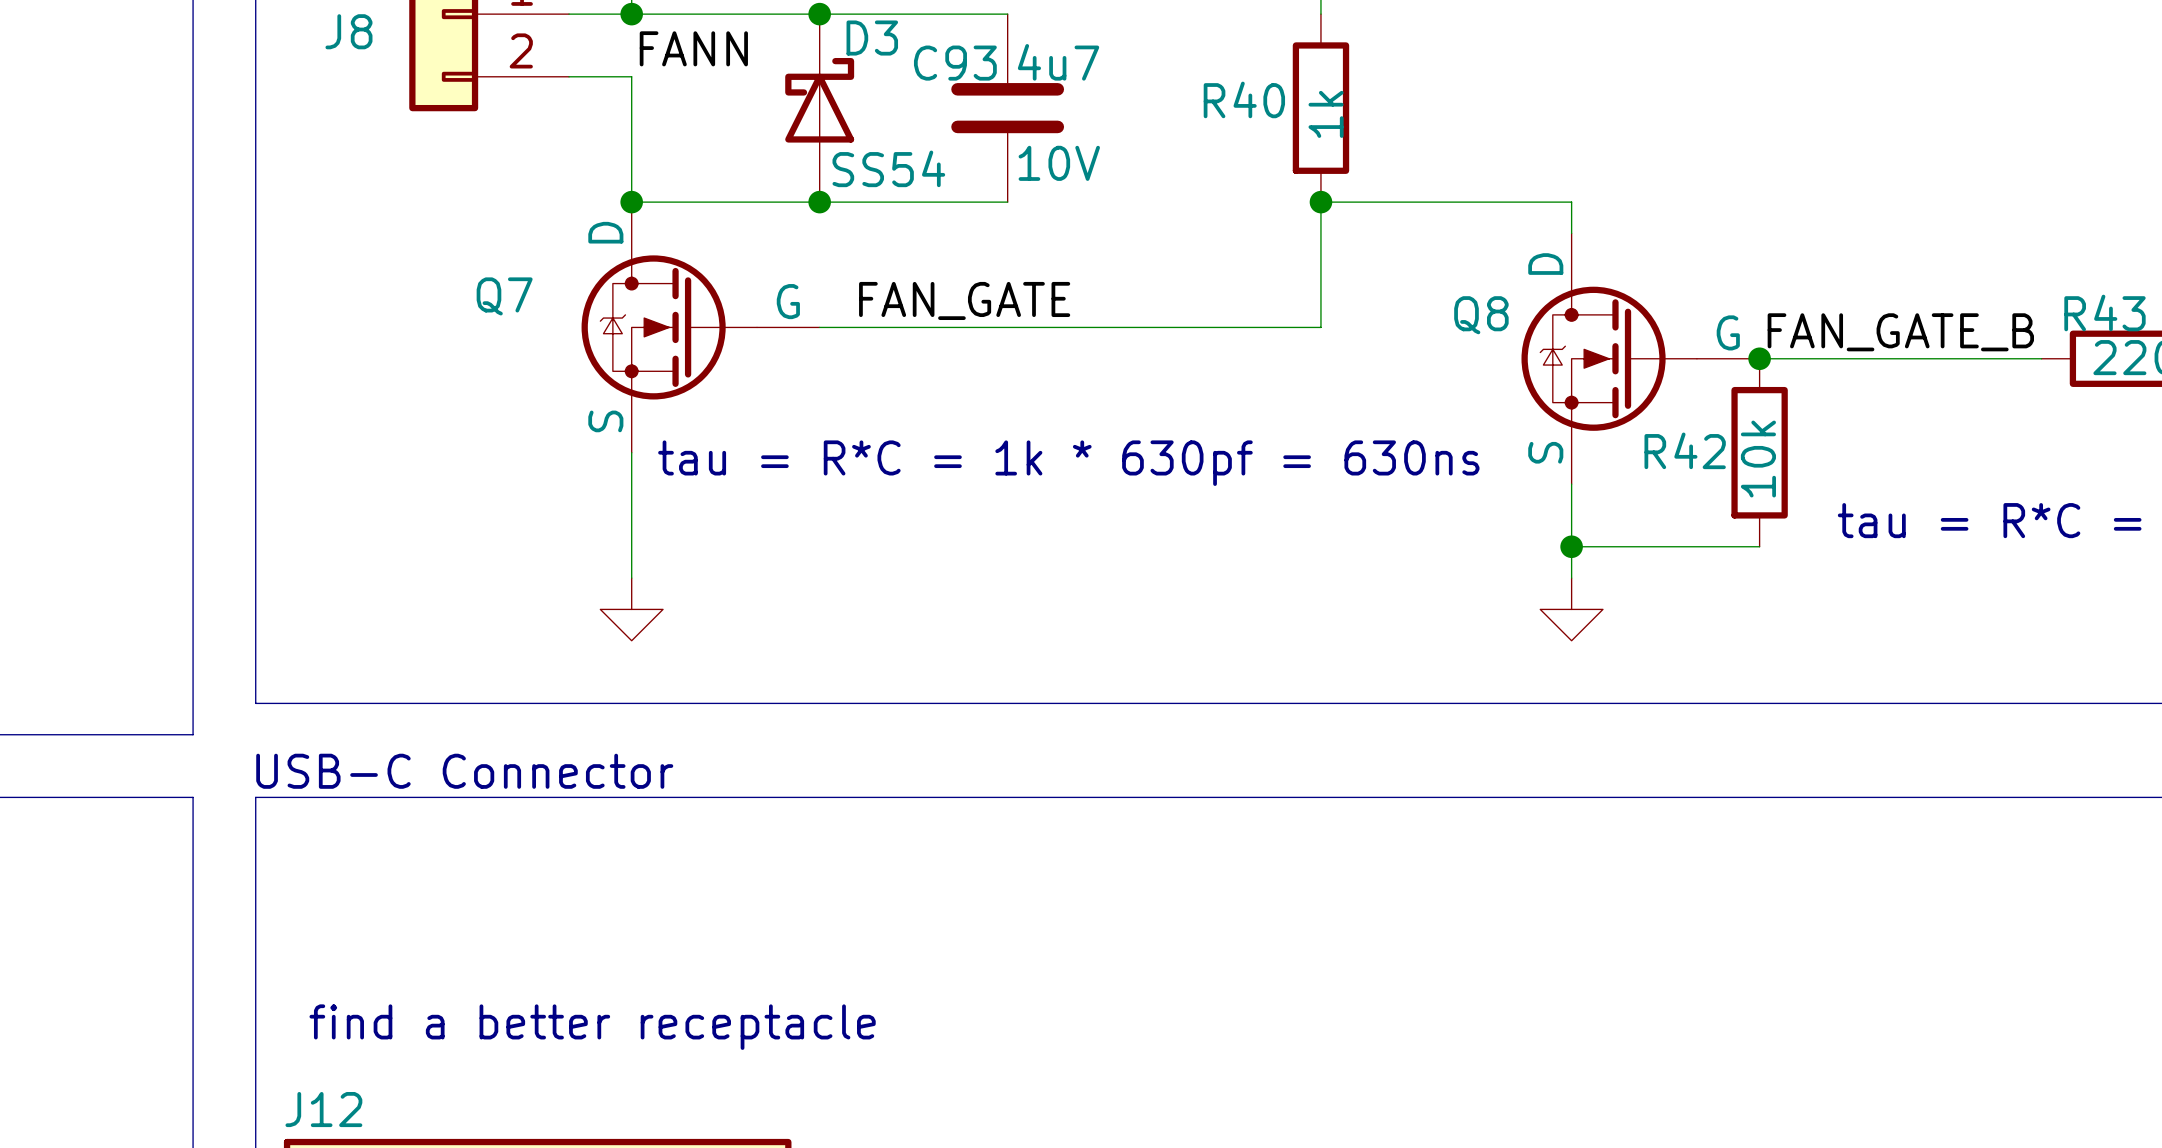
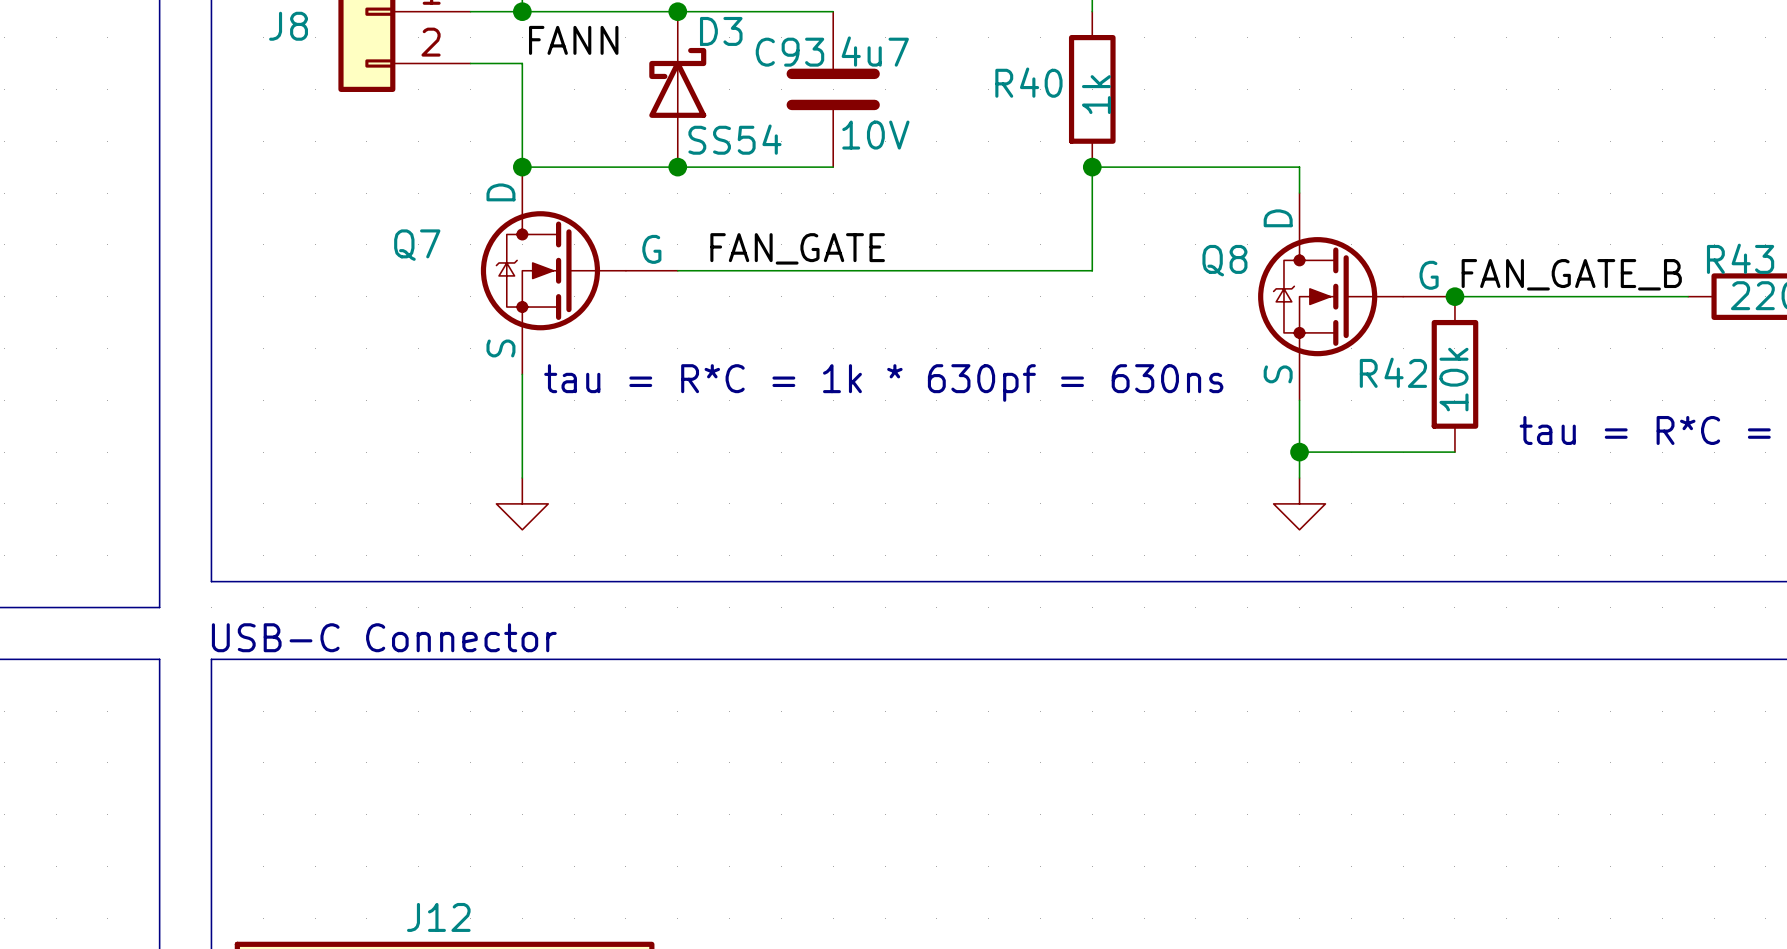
text: find a better receptacle (592, 1027) -> none
J12 name position: J12 (323, 1109) -> J12 (438, 917)

